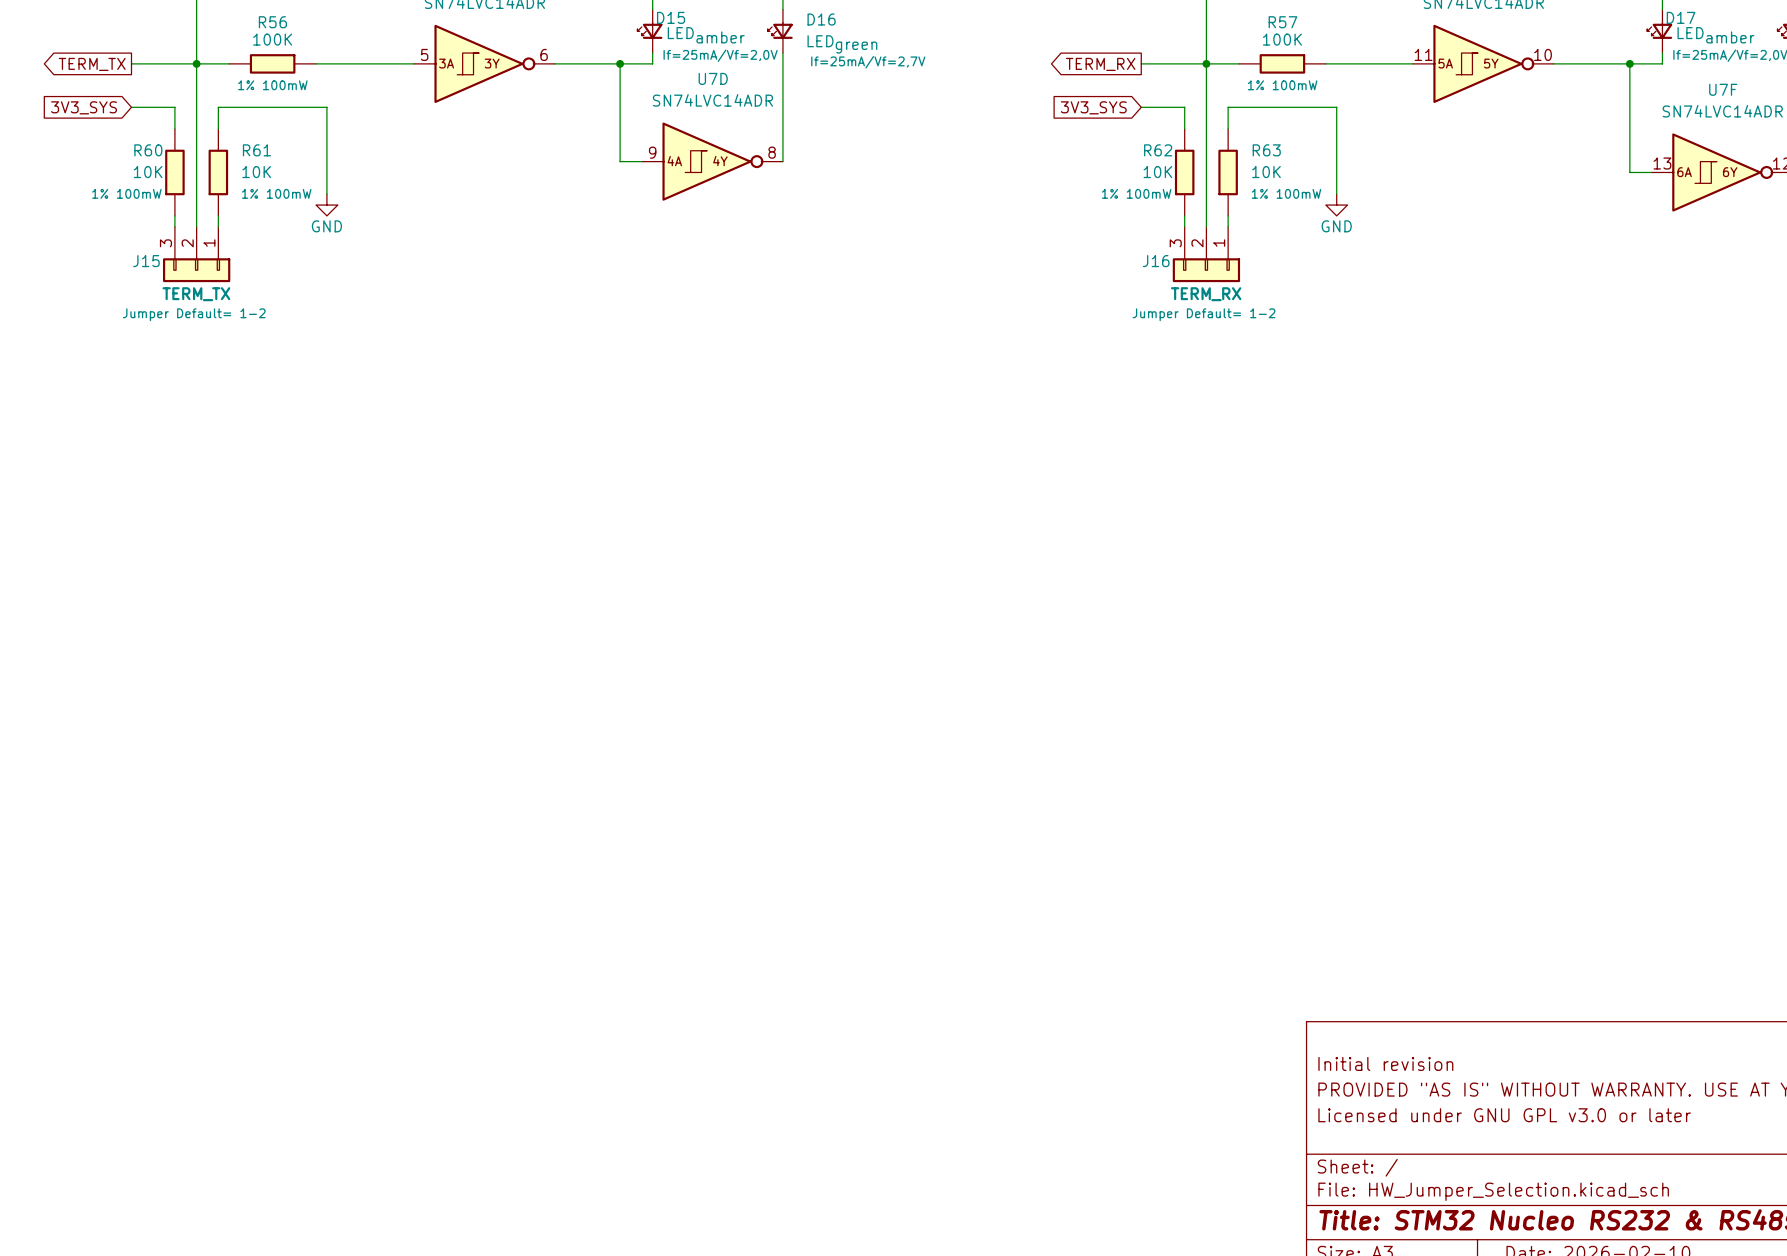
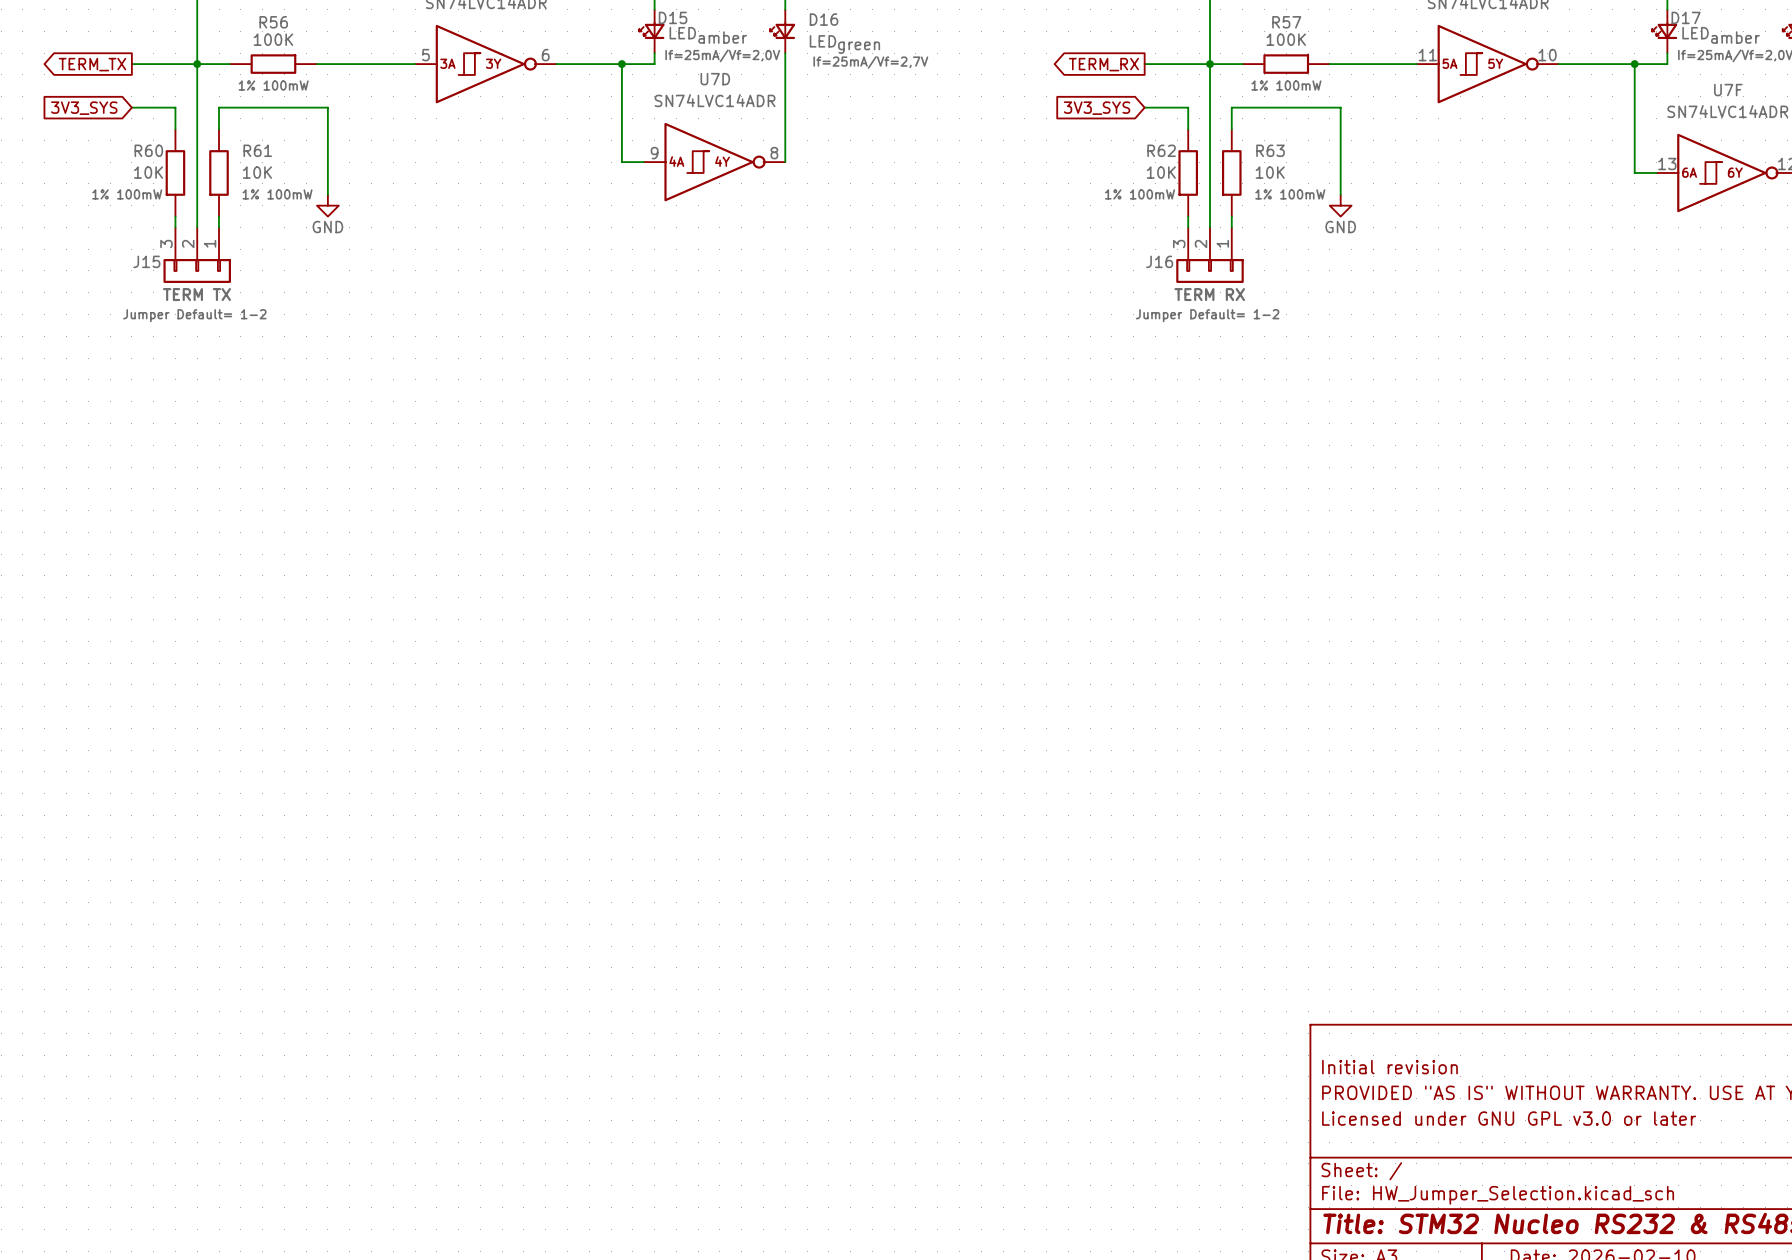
J15 value: TERM_TX (196, 294) -> TERM TX (196, 294)
J16 value: TERM_RX (1206, 294) -> TERM RX (1209, 294)

